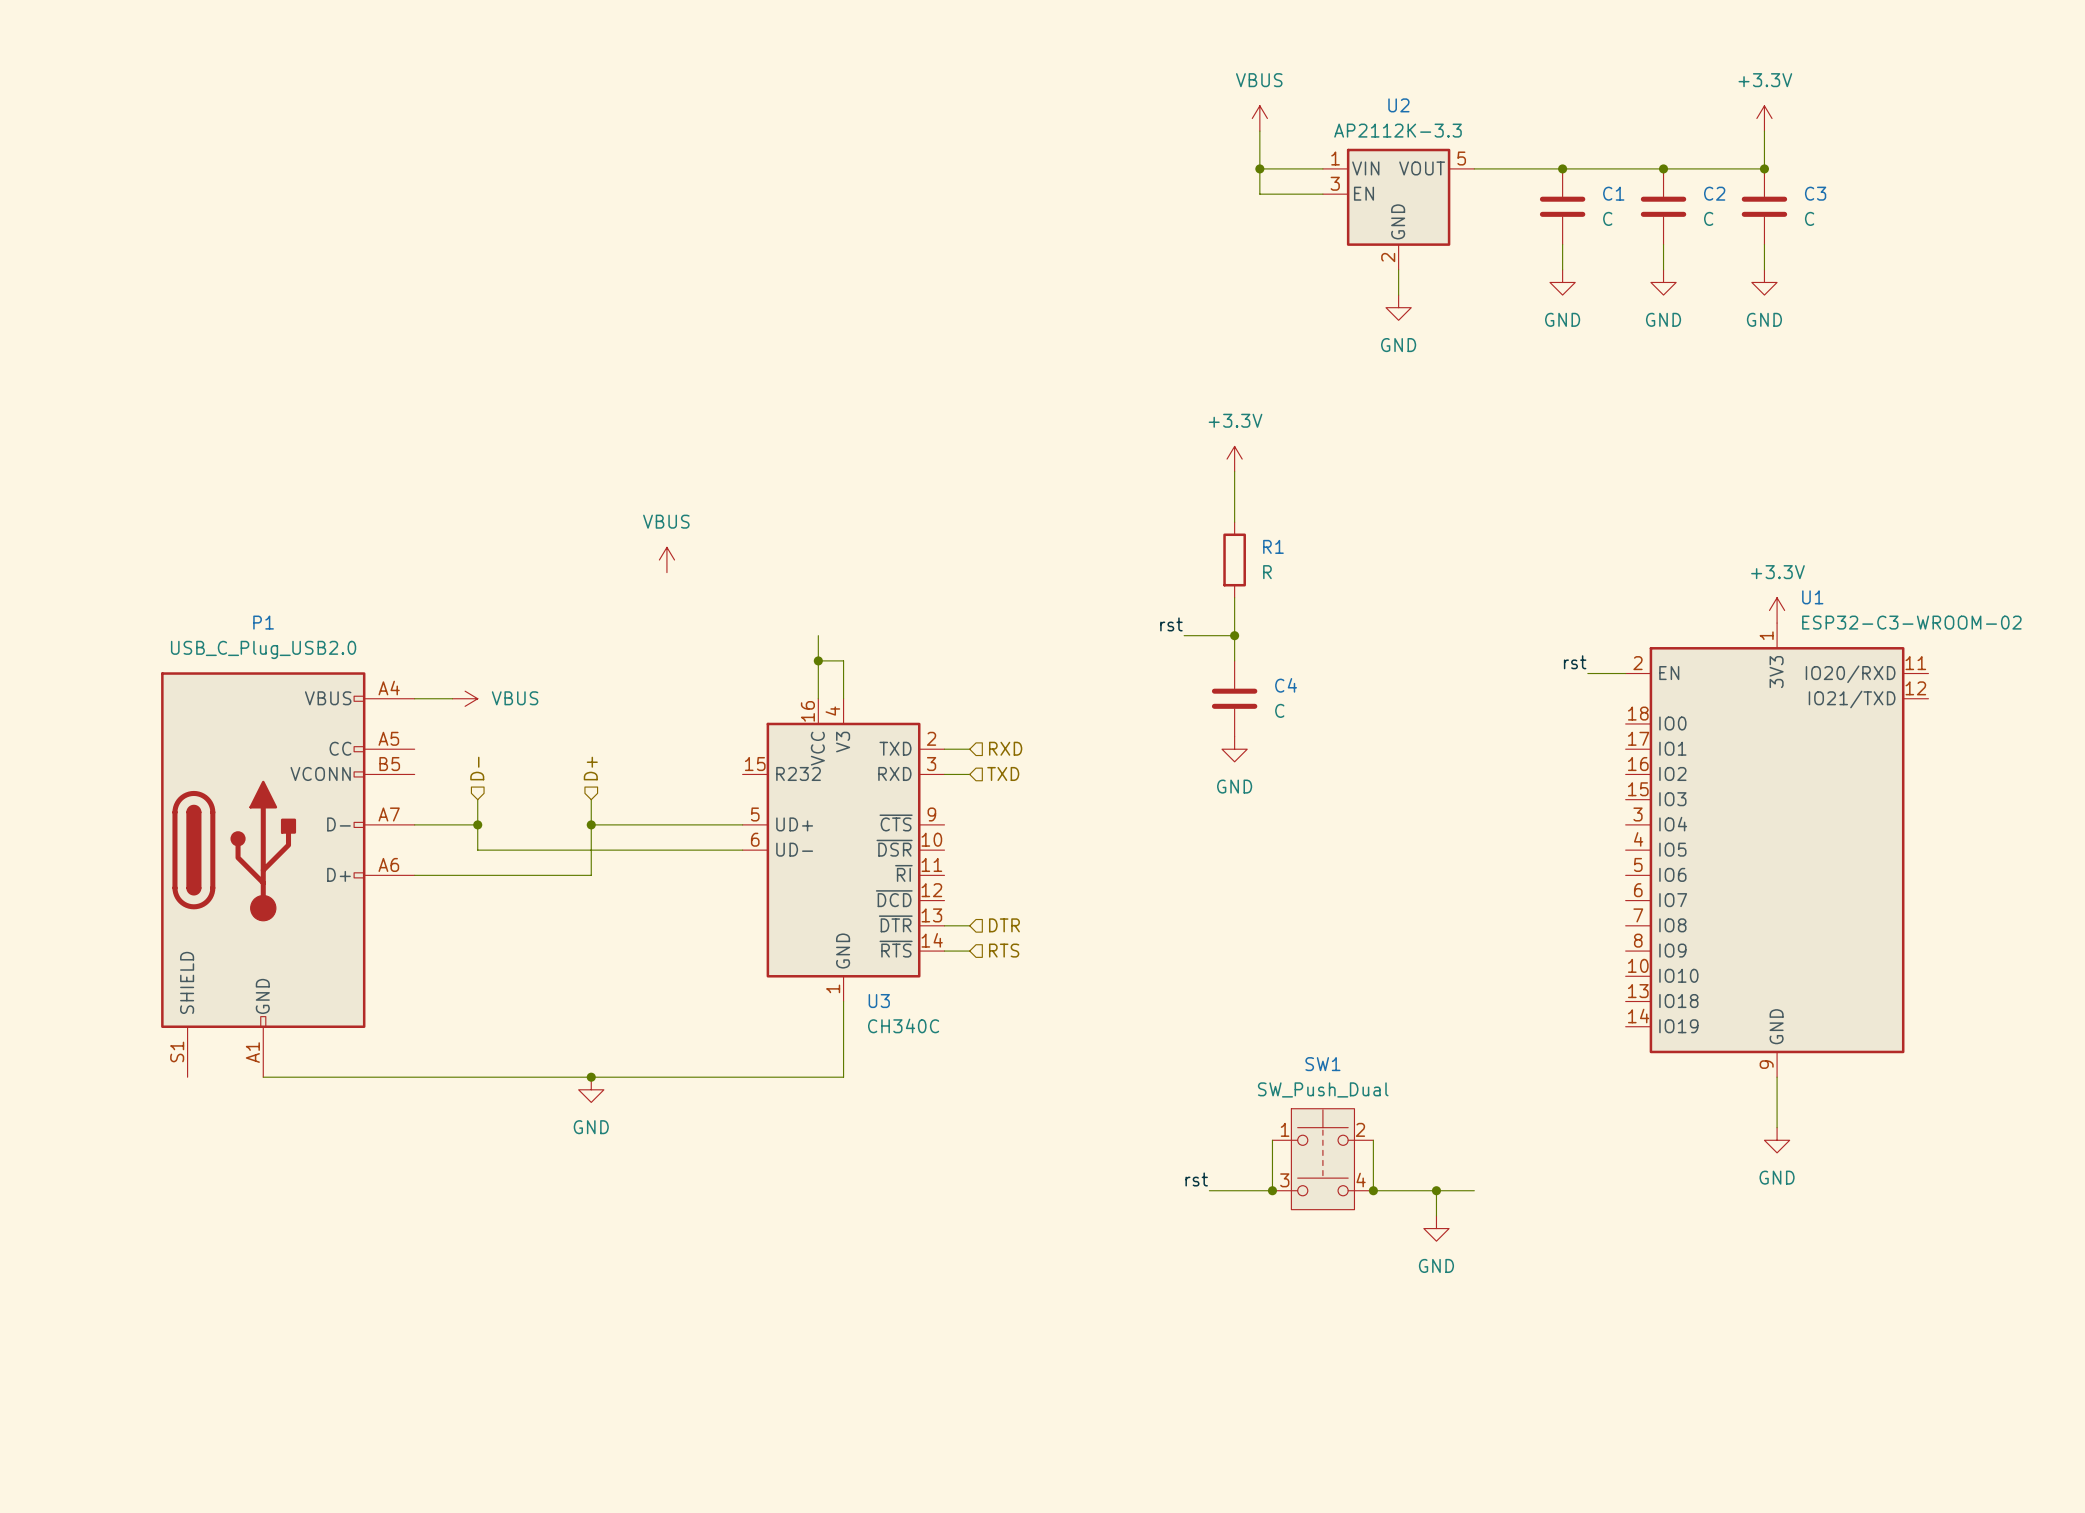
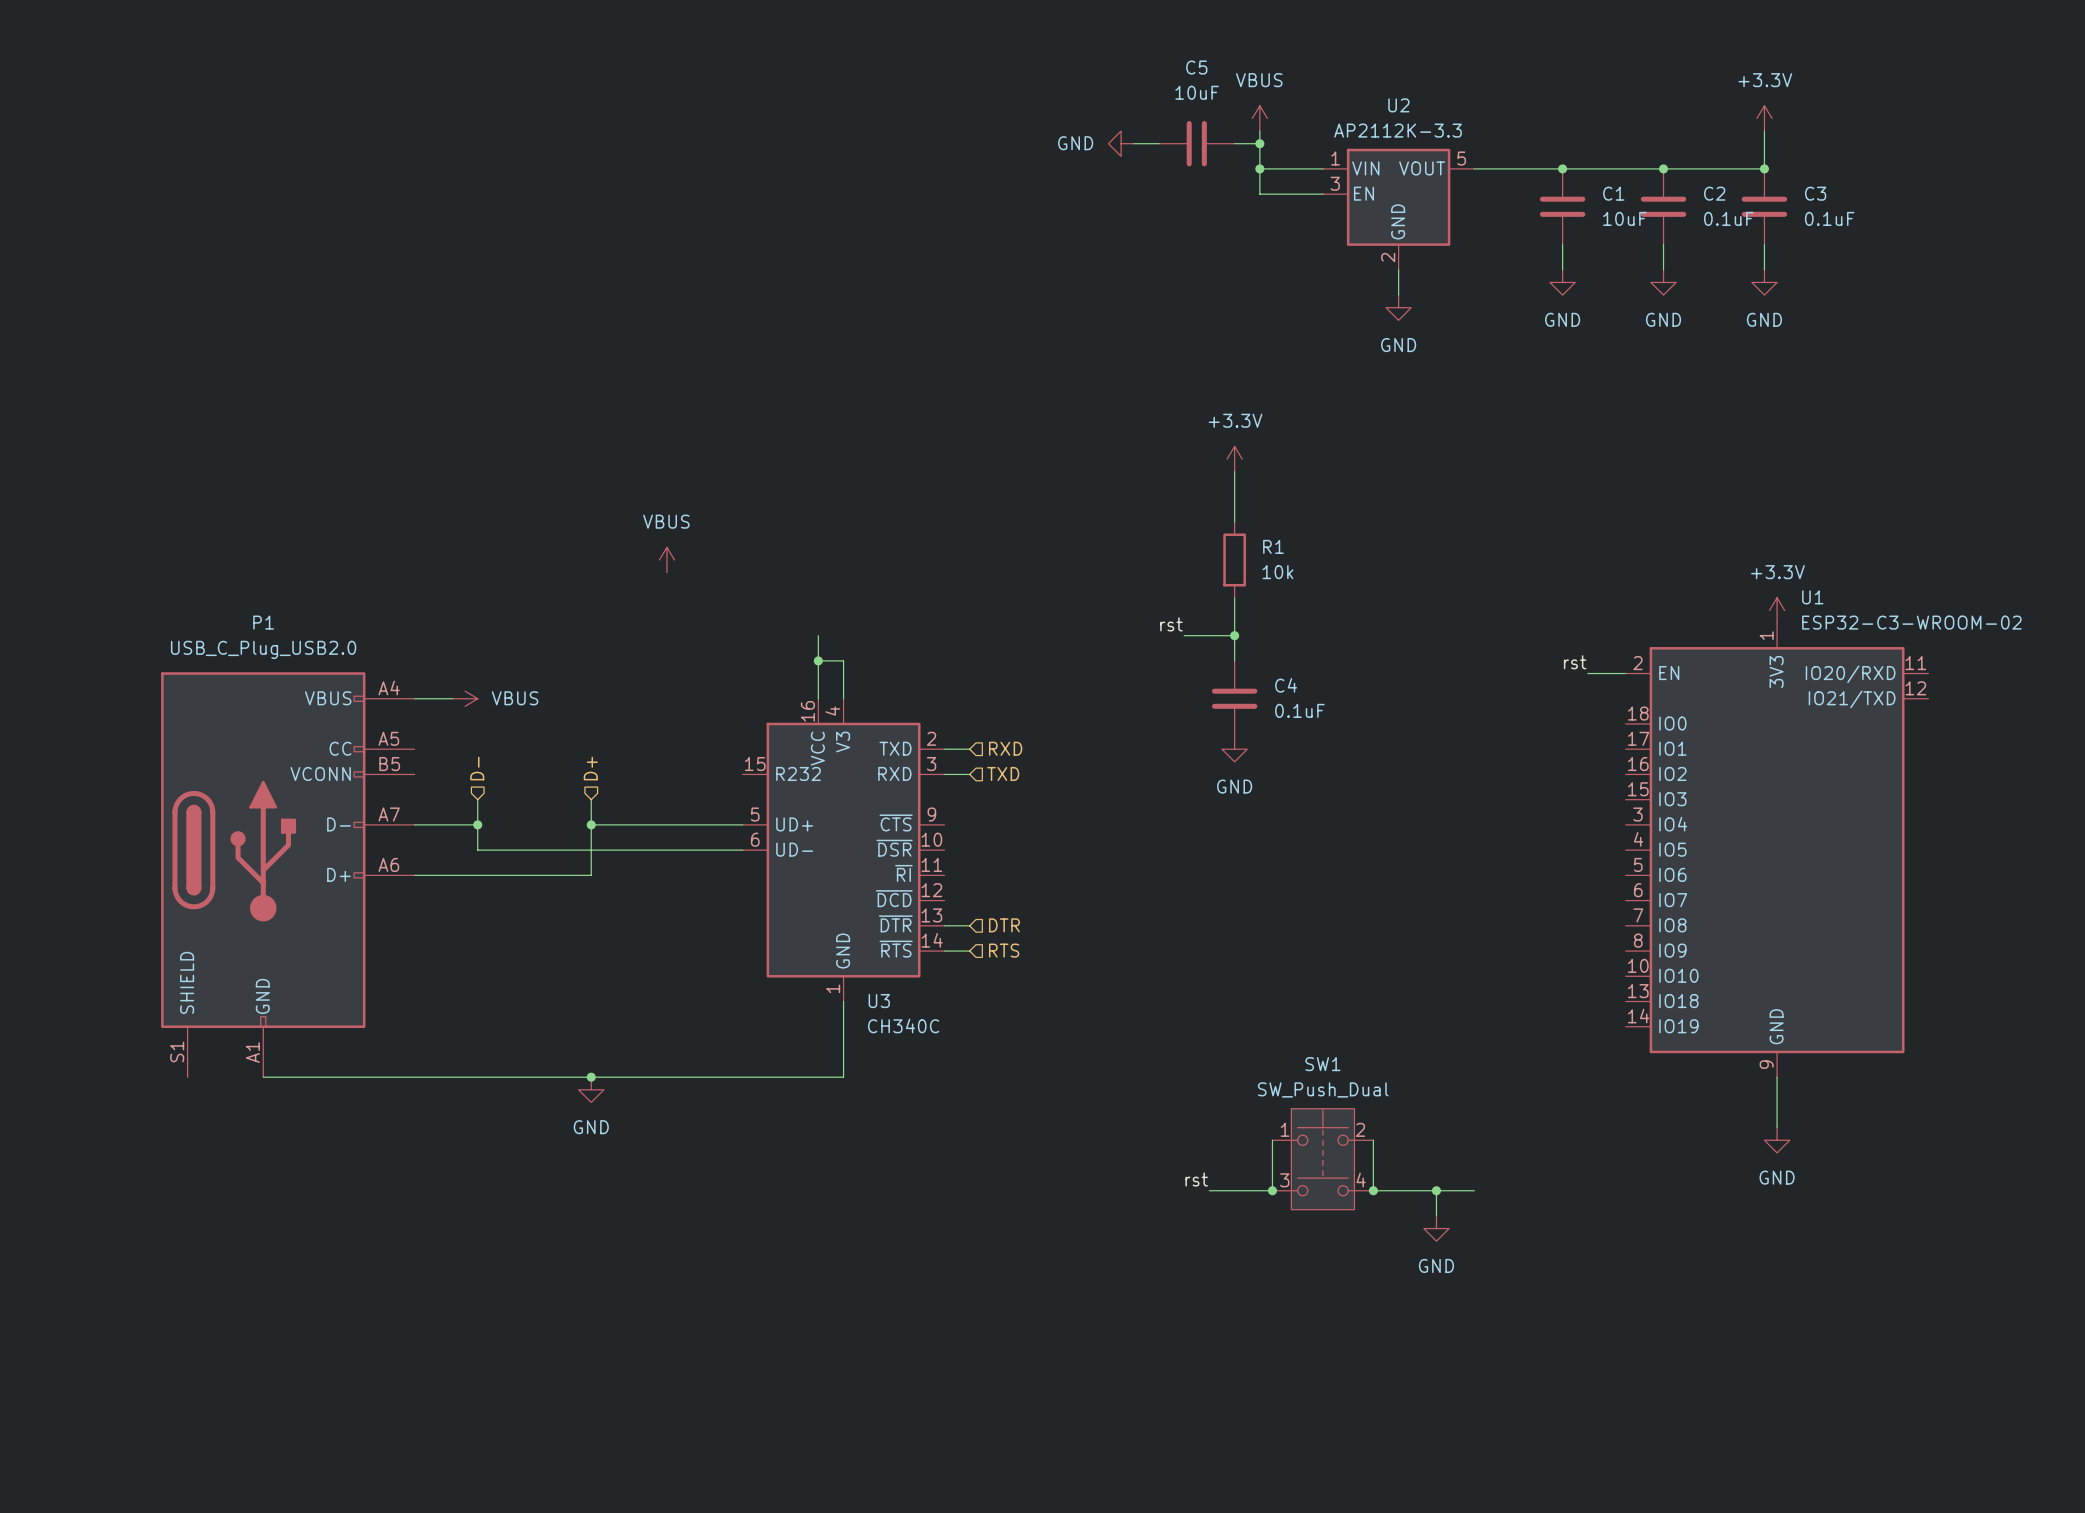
power symbol: none -> GND (1121, 143)
wire: none -> (1133, 143) (1158, 143)
C5: none -> 10uF (1196, 143)
wire: none -> (1234, 143) (1259, 143)
junction: none -> (1259, 143)
C1 value: C (1607, 218) -> 10uF (1624, 218)
C2 value: C (1708, 218) -> 0.1uF (1728, 218)
C3 value: C (1809, 218) -> 0.1uF (1829, 218)
R1 value: R (1267, 572) -> 10k (1277, 572)
C4 value: C (1279, 710) -> 0.1uF (1299, 710)

